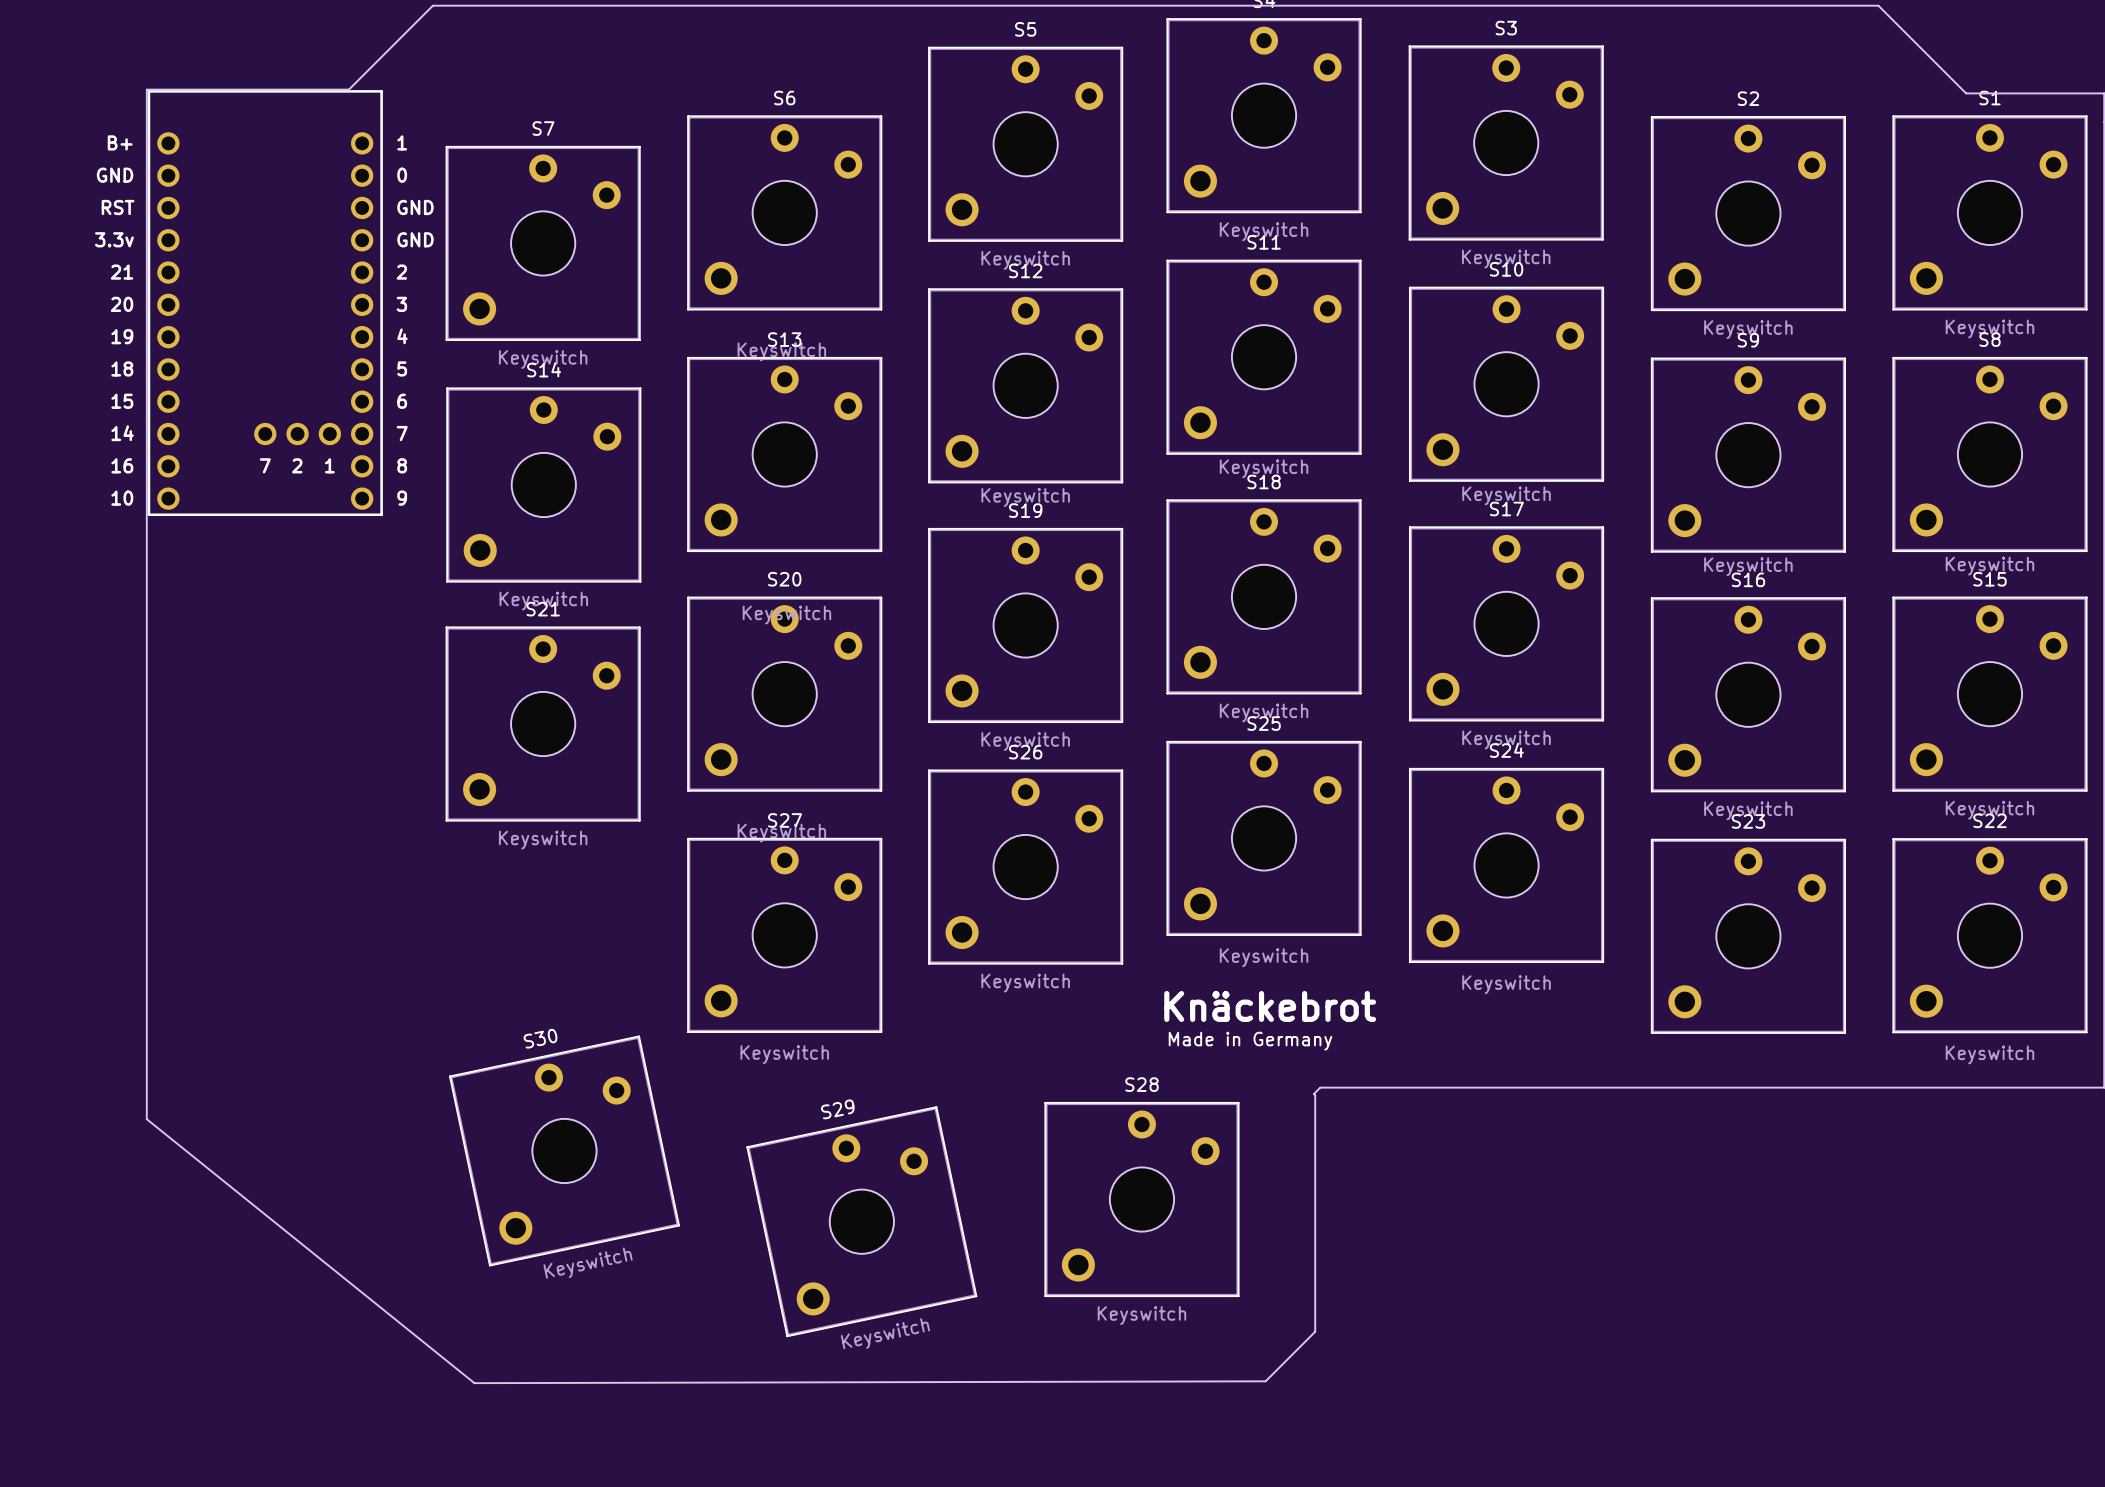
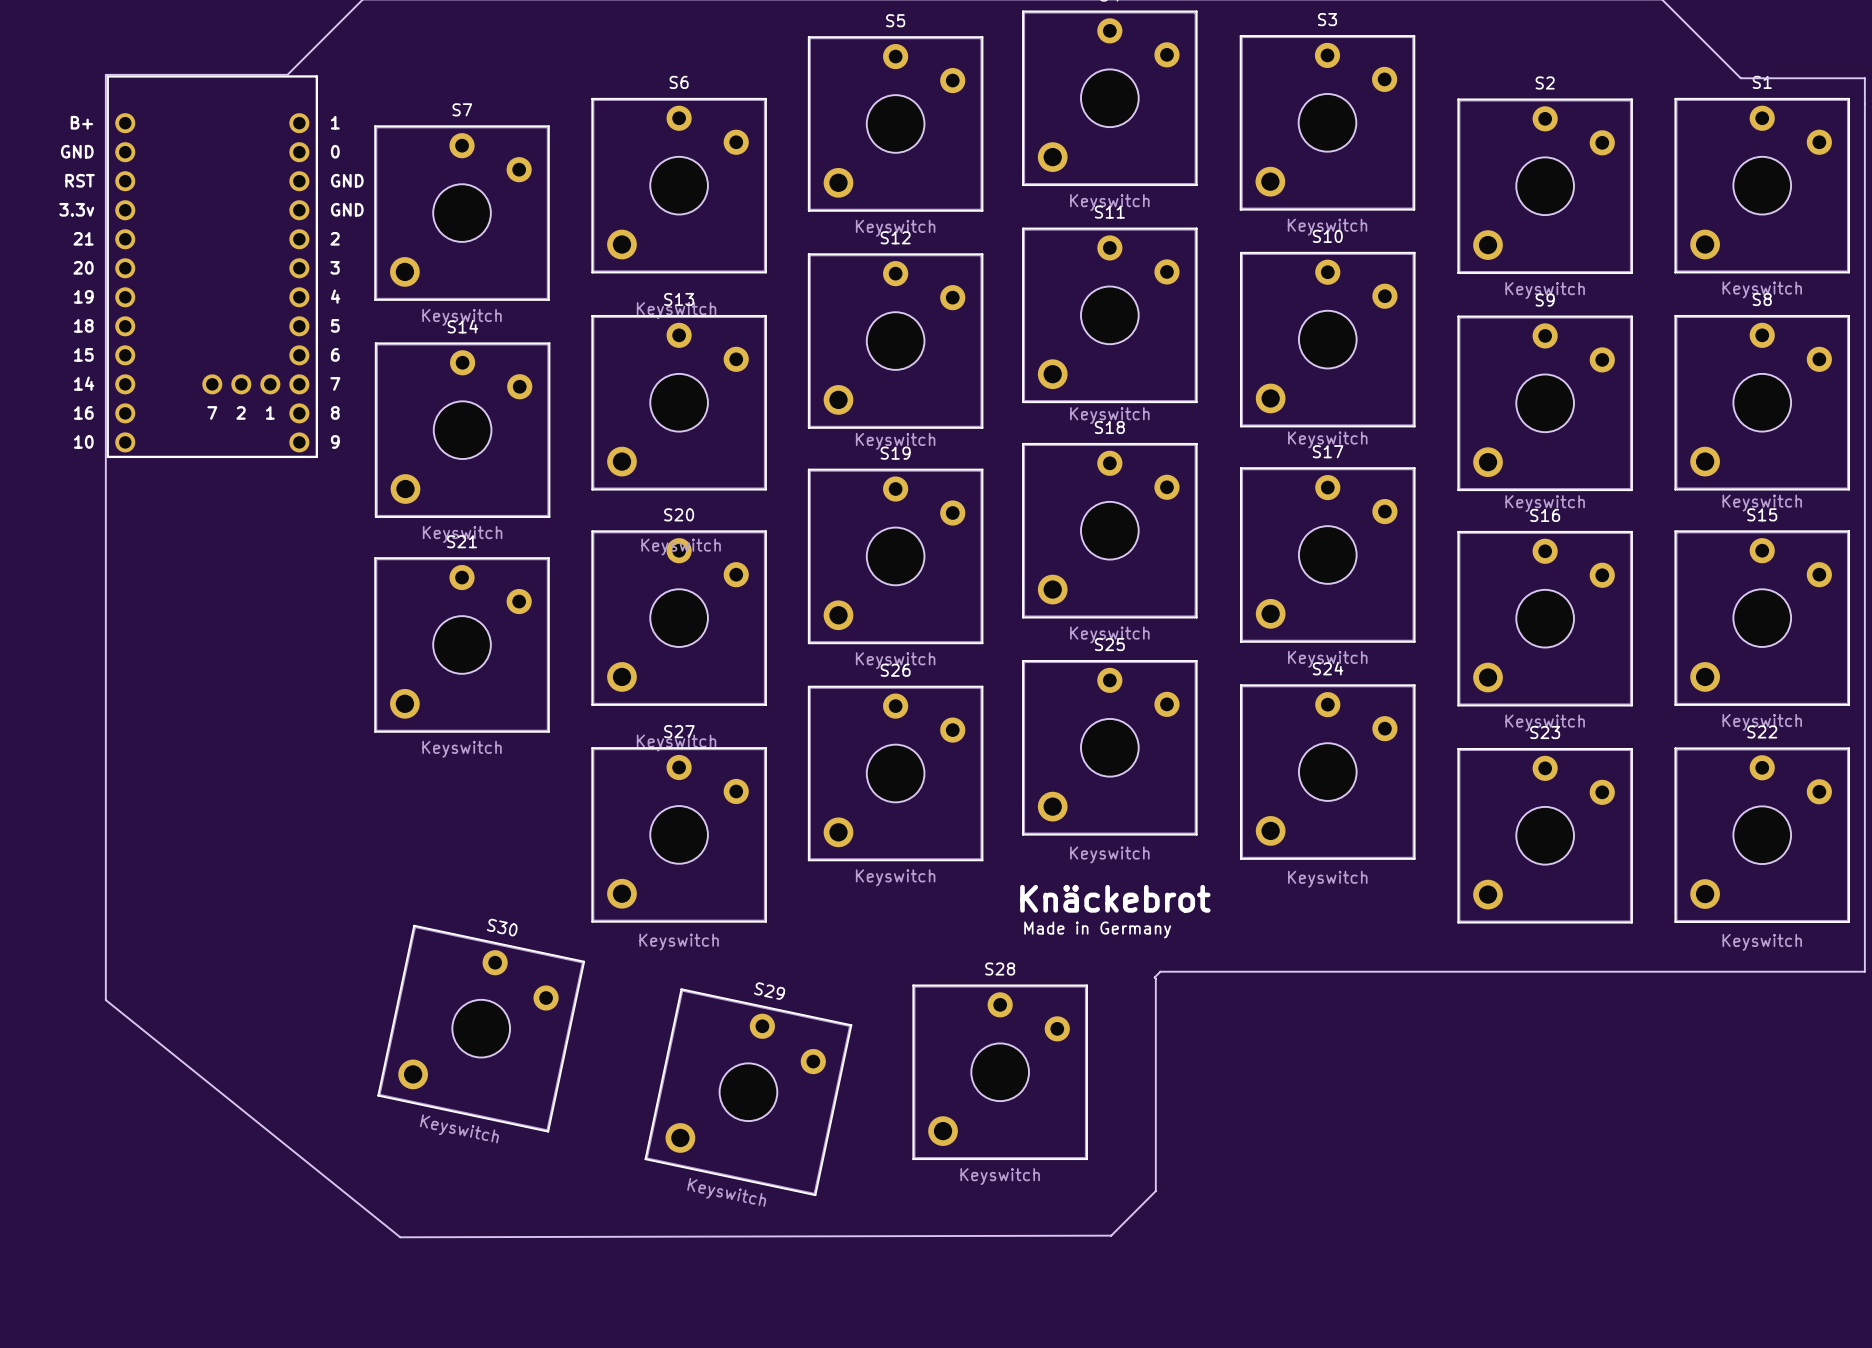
S30 rotation: 0° (564, 1150) -> 23.9° clockwise (481, 1028)
S29 rotation: 0° (861, 1221) -> 23.9° clockwise (748, 1092)

